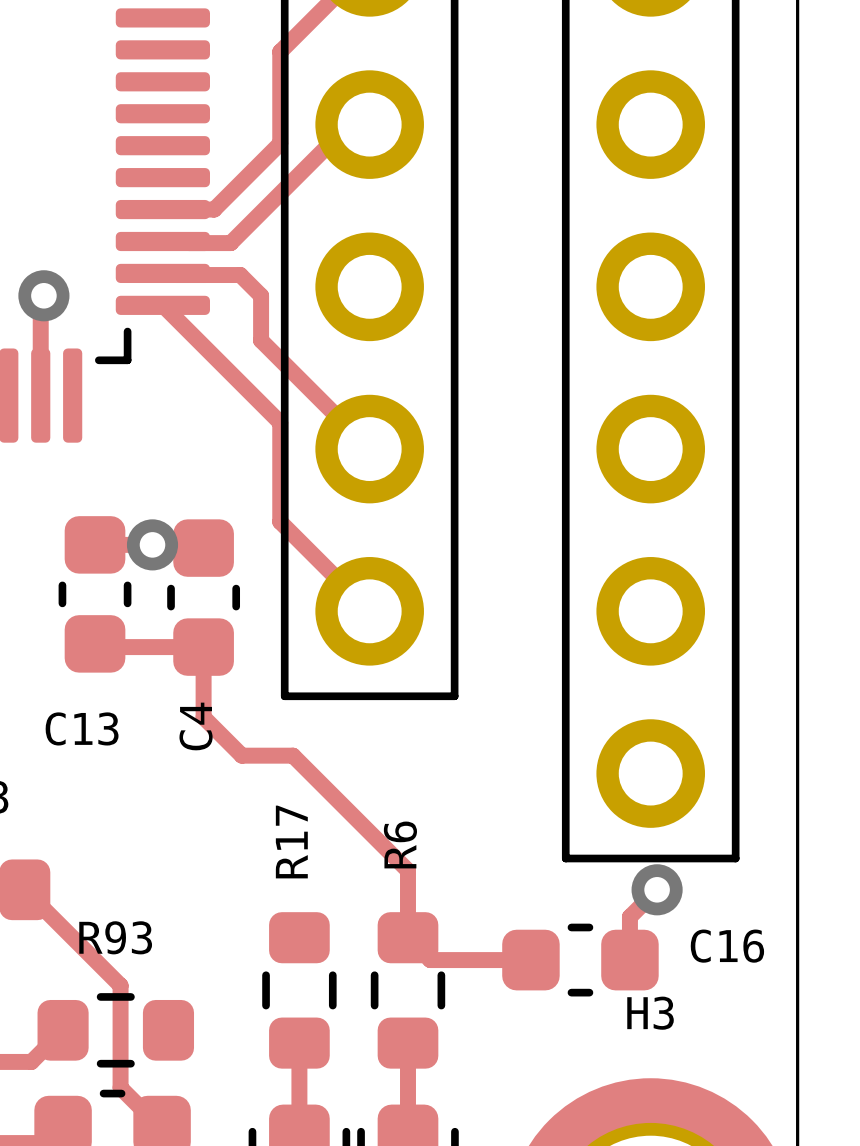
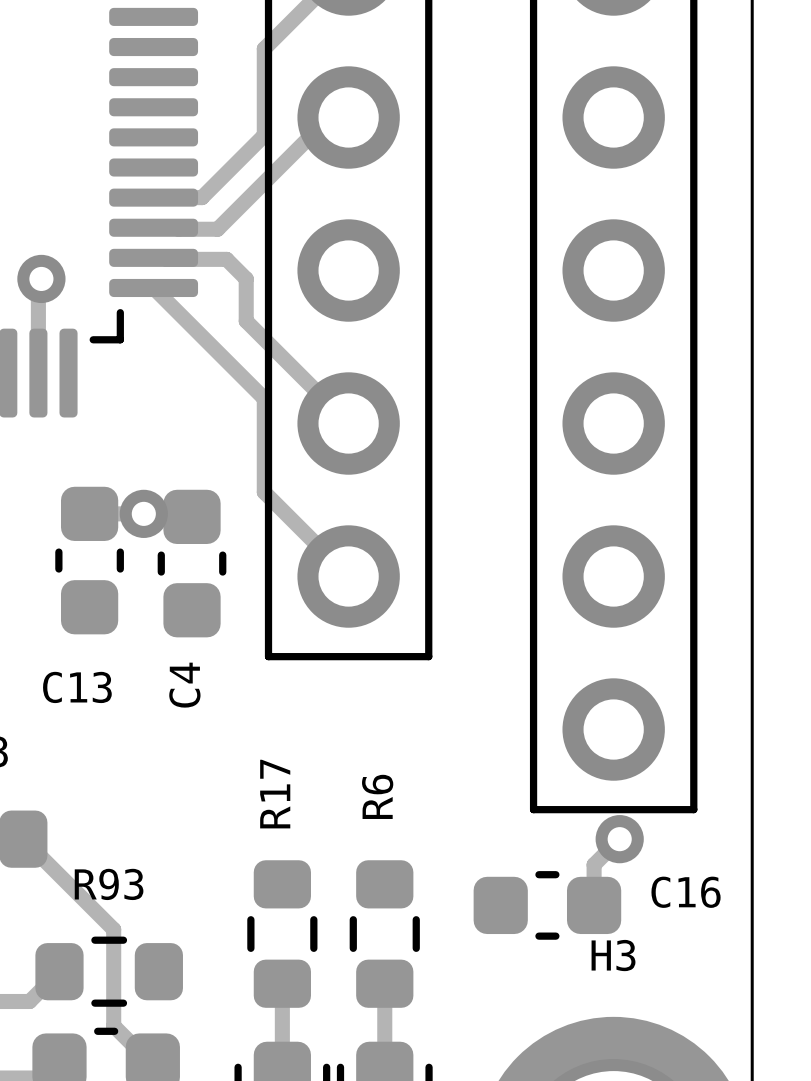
track: (95, 643) (98, 647) (203, 647) (203, 717) (241, 755) (293, 755) (407, 870) (407, 937) (430, 960) (530, 960) -> none

